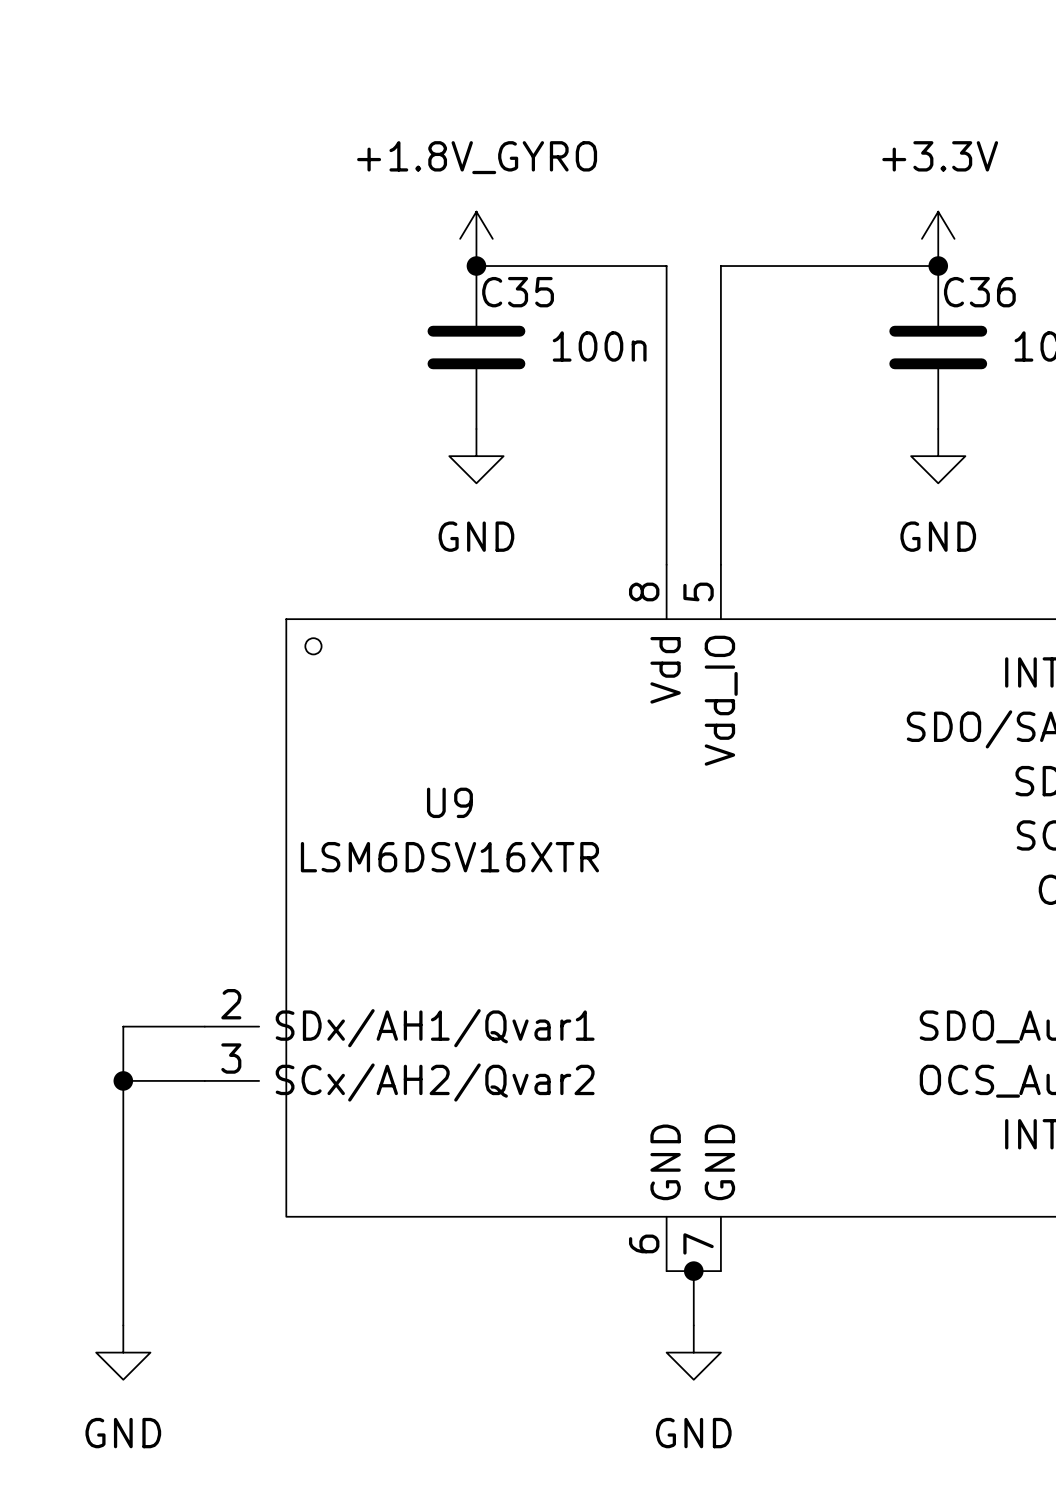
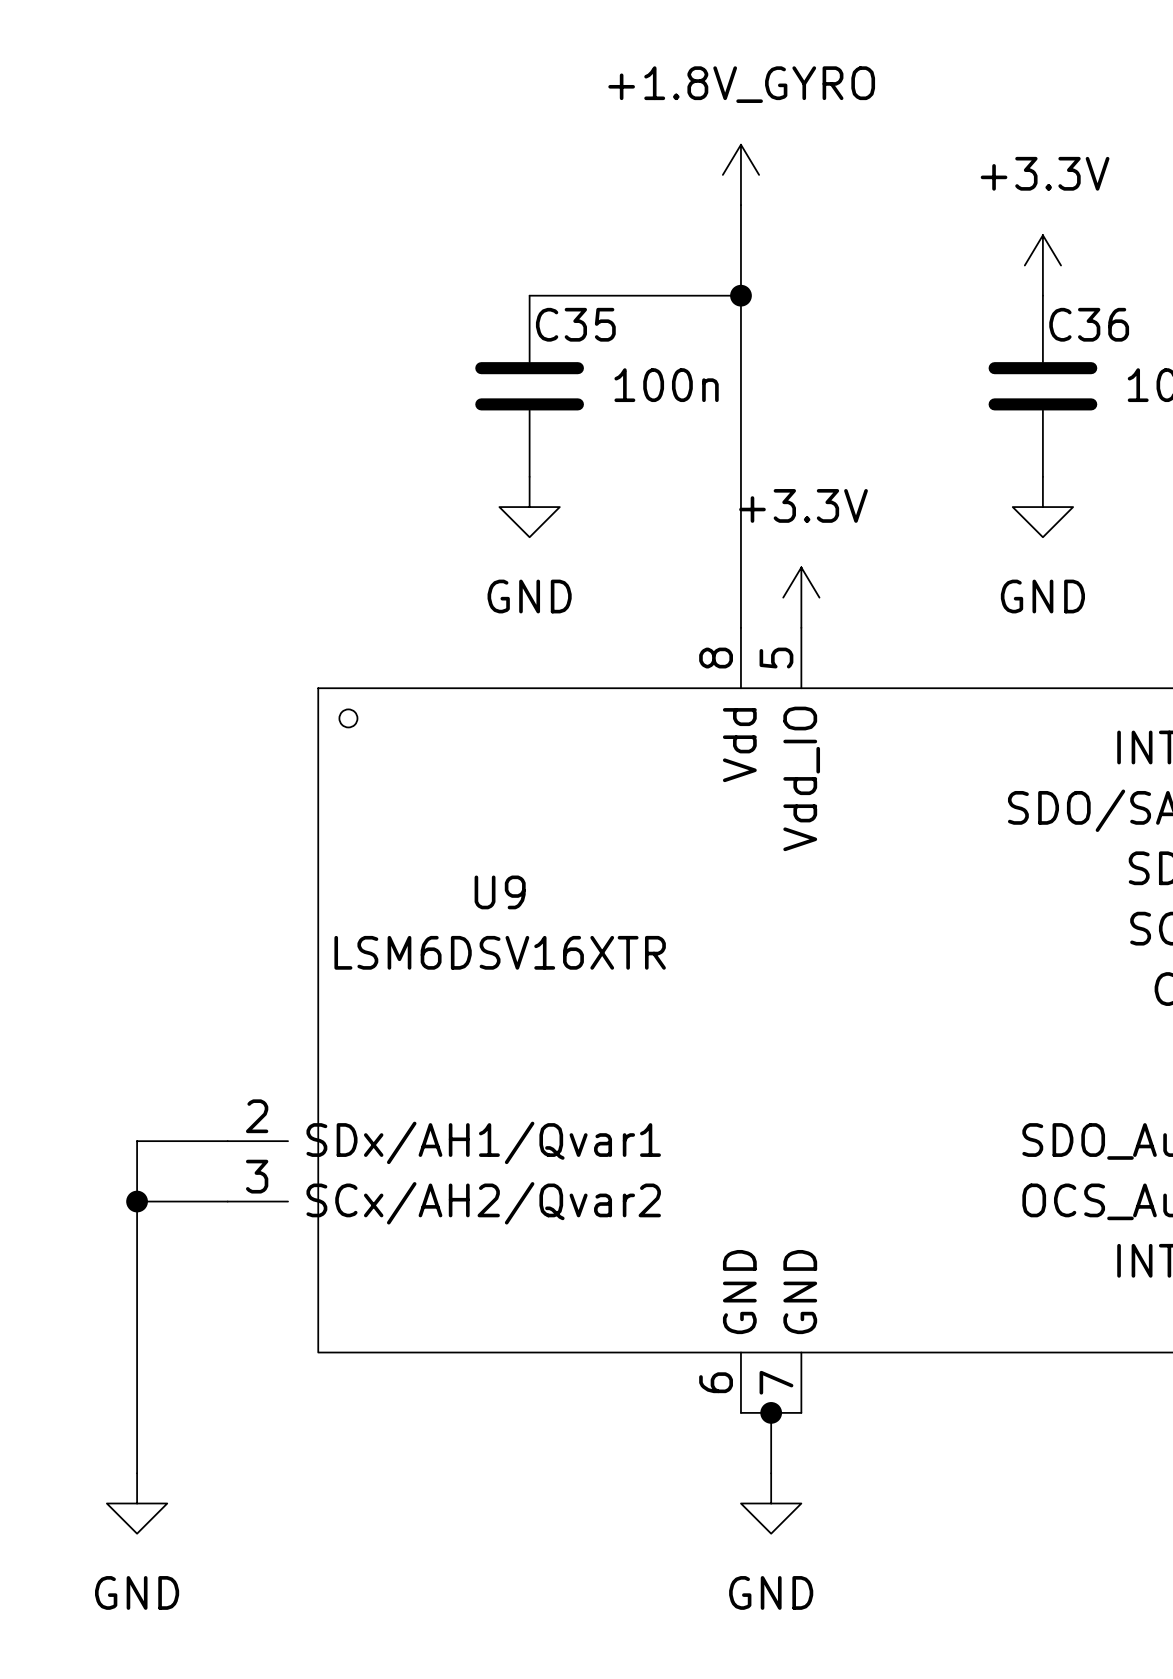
wire: none -> (740, 205) (740, 295)
power symbol position: +1.8V_GYRO (476, 238) -> +1.8V_GYRO (740, 174)
junction: (476, 266) -> none
junction: none -> (740, 295)
wire: (938, 266) (720, 266) (720, 564) -> none
junction: (938, 266) -> none
power symbol: none -> +3.3V (801, 597)

